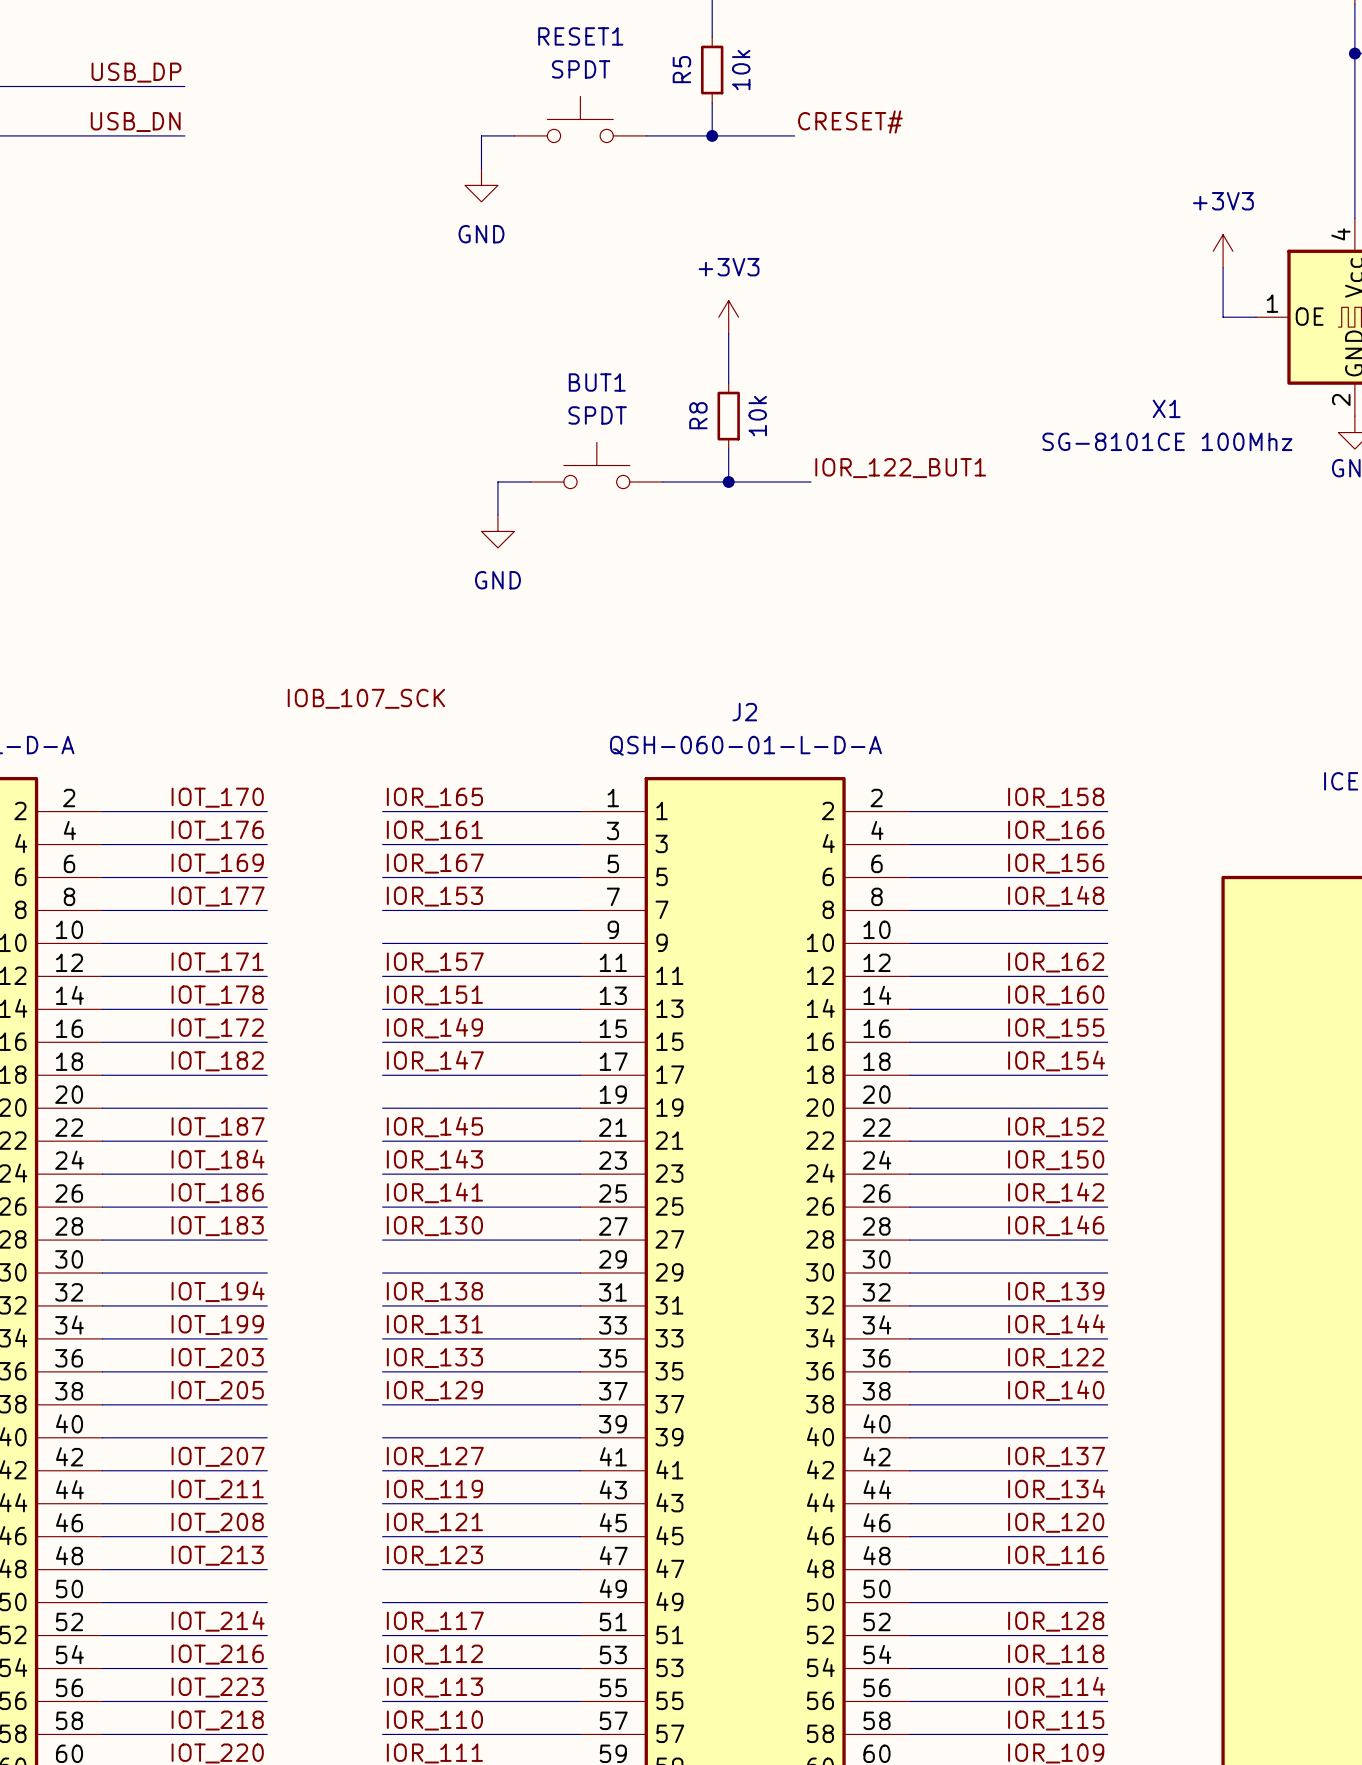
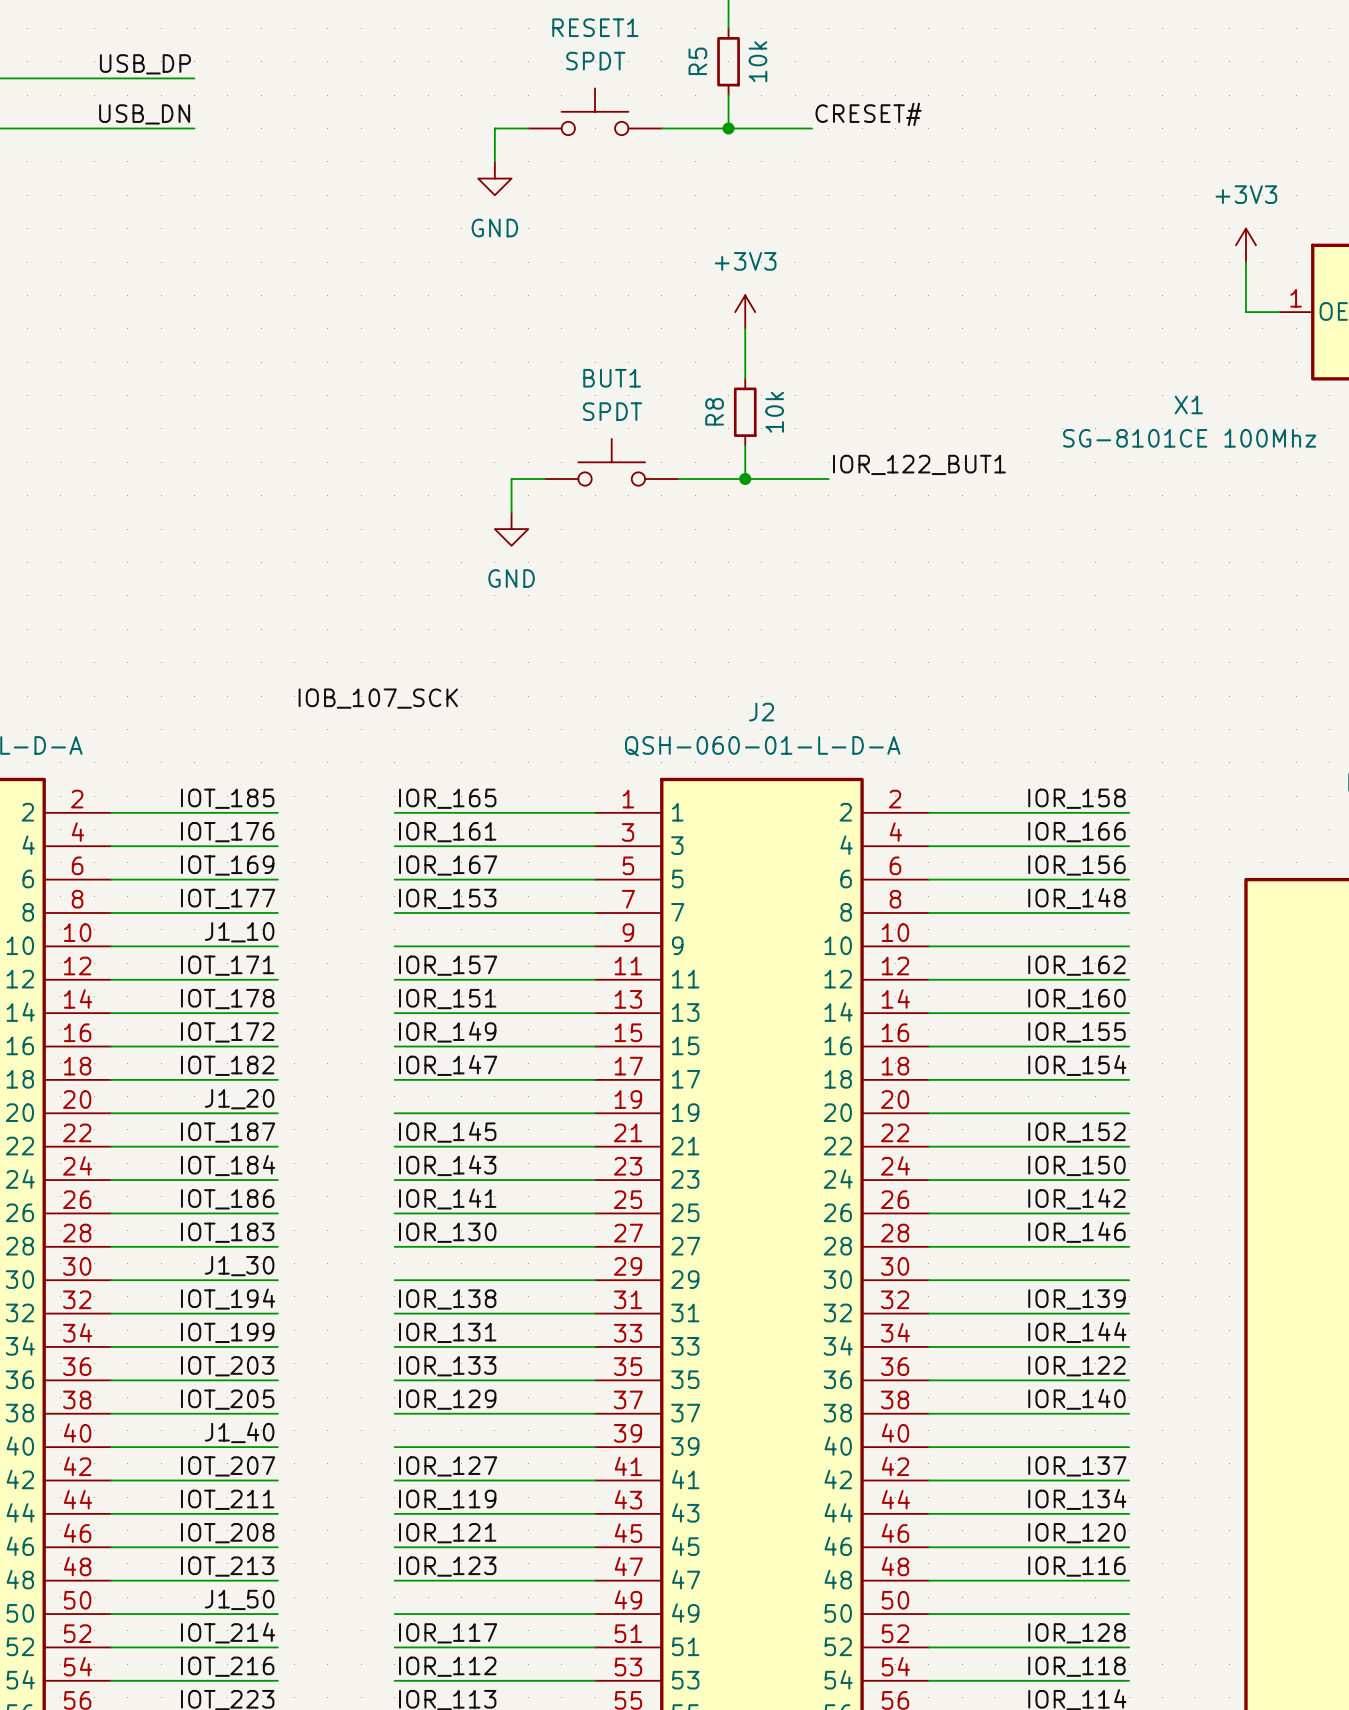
label: IOT_170 (217, 797) -> IOT_185 (227, 798)
label: none -> J1_10 (239, 932)
label: none -> J1_20 (239, 1099)
label: none -> J1_30 (239, 1266)
label: none -> J1_40 (239, 1432)
label: none -> J1_50 (239, 1599)

